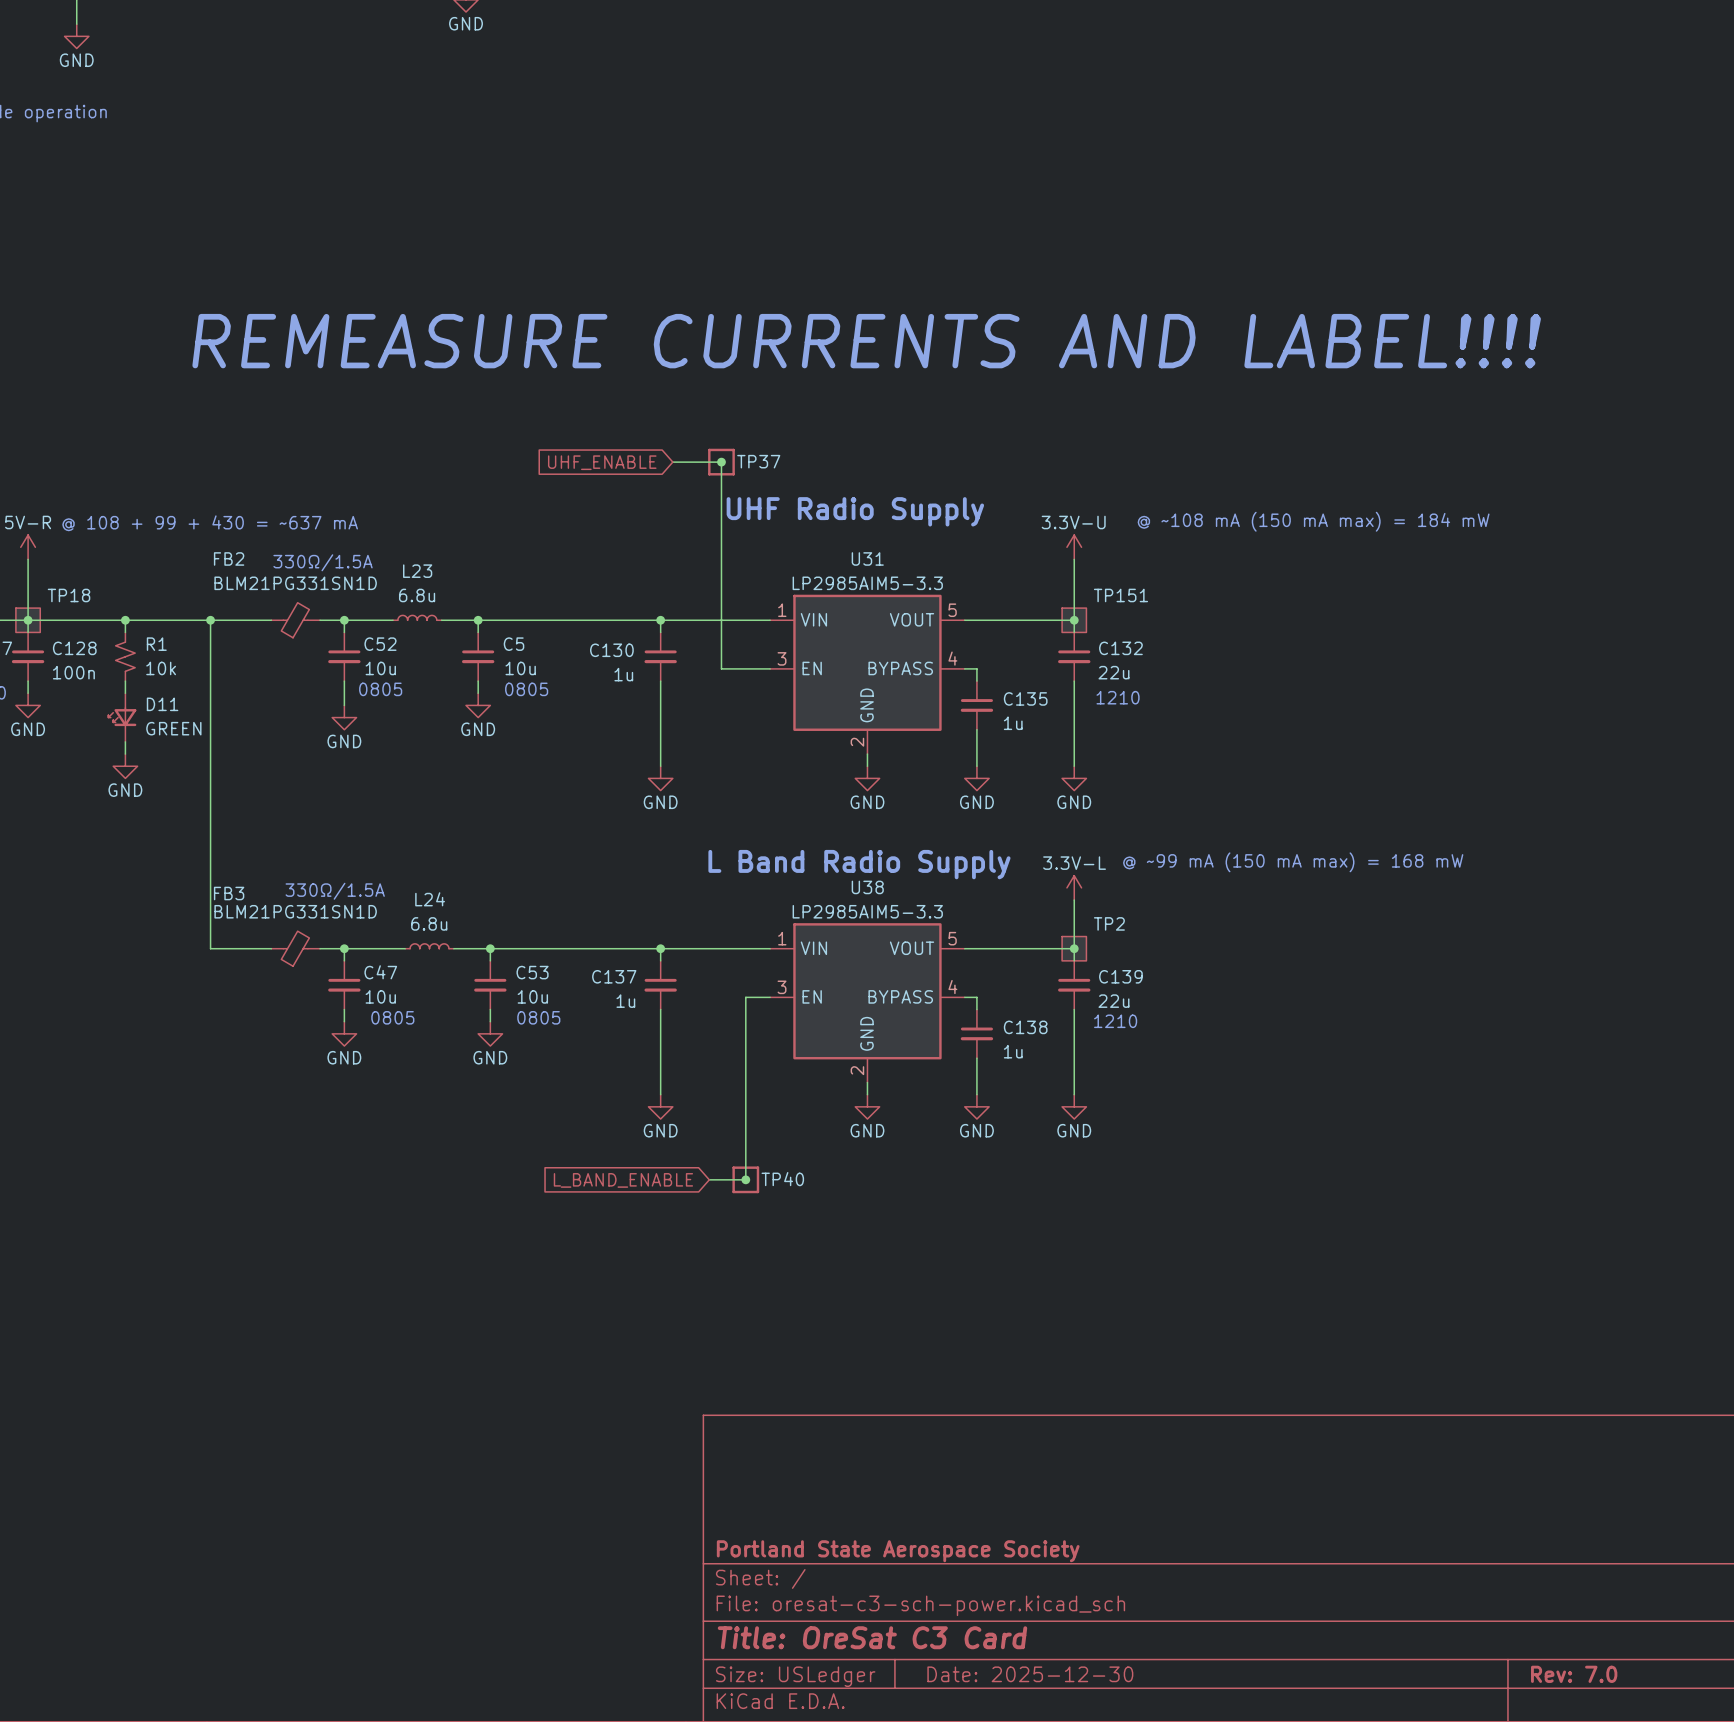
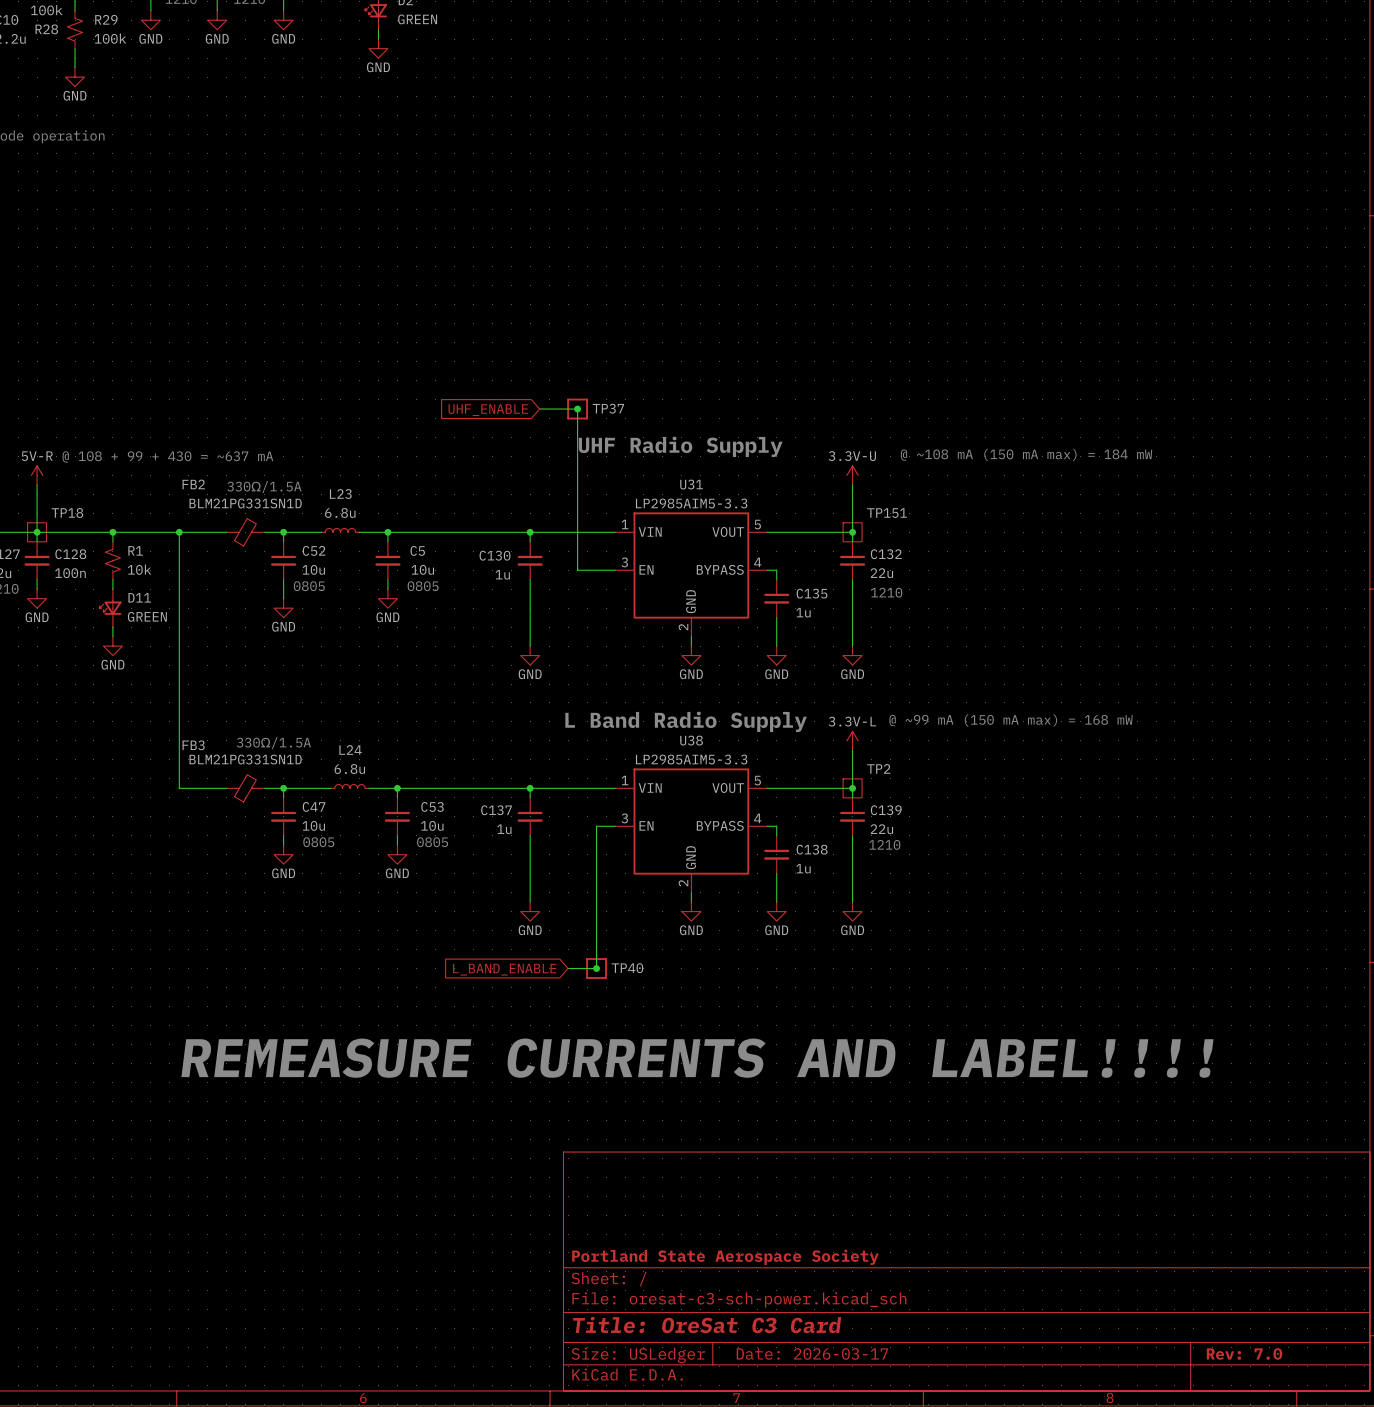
text: REMEASURE CURRENTS AND LABEL!!!! (866, 341) -> none
text: none -> REMEASURE CURRENTS AND LABEL!!!! (697, 1058)
title block: Date: 2025-12-30 (1030, 1674) -> Date: 2026-03-17 (812, 1353)

